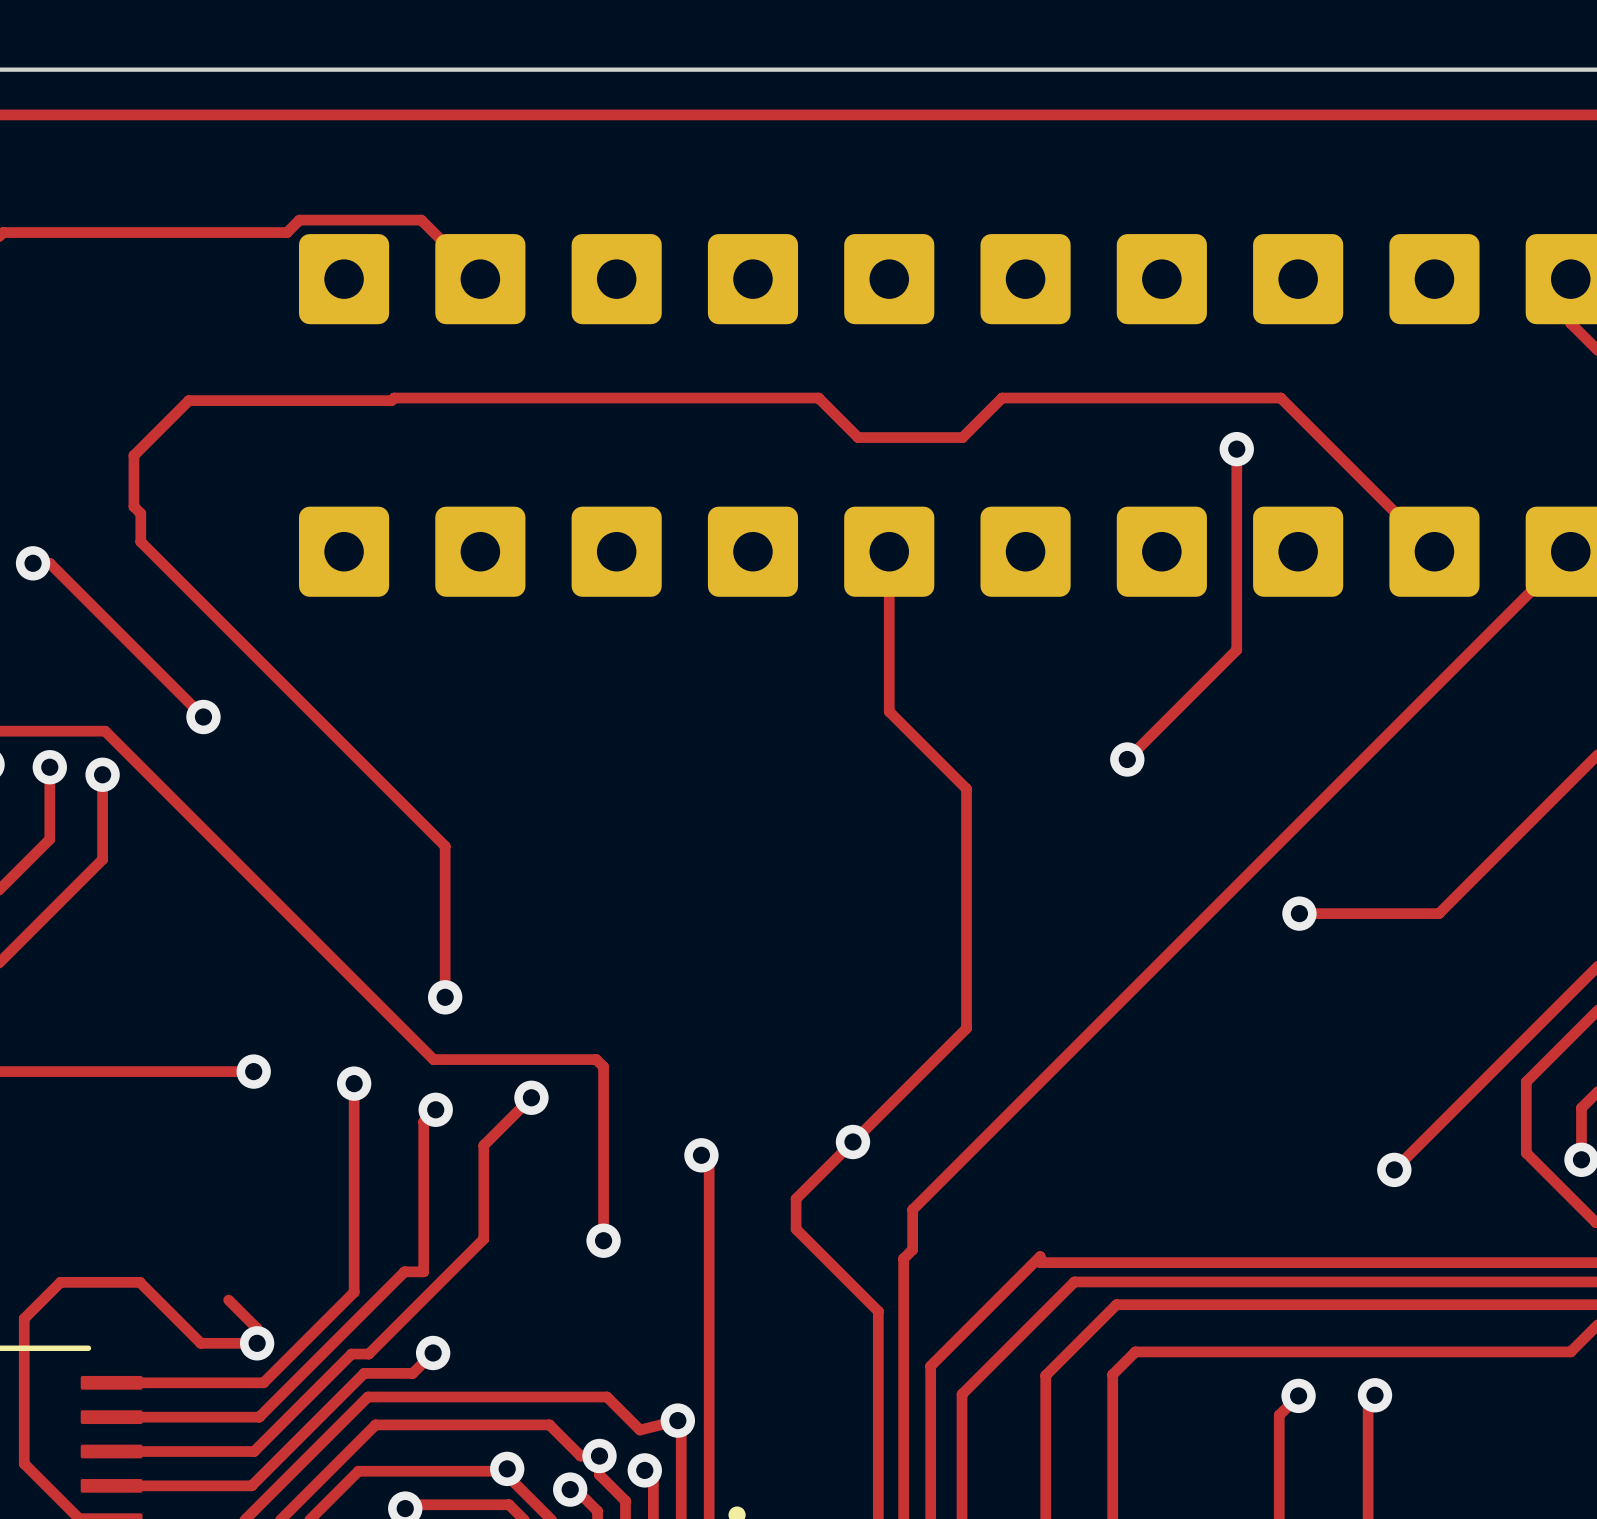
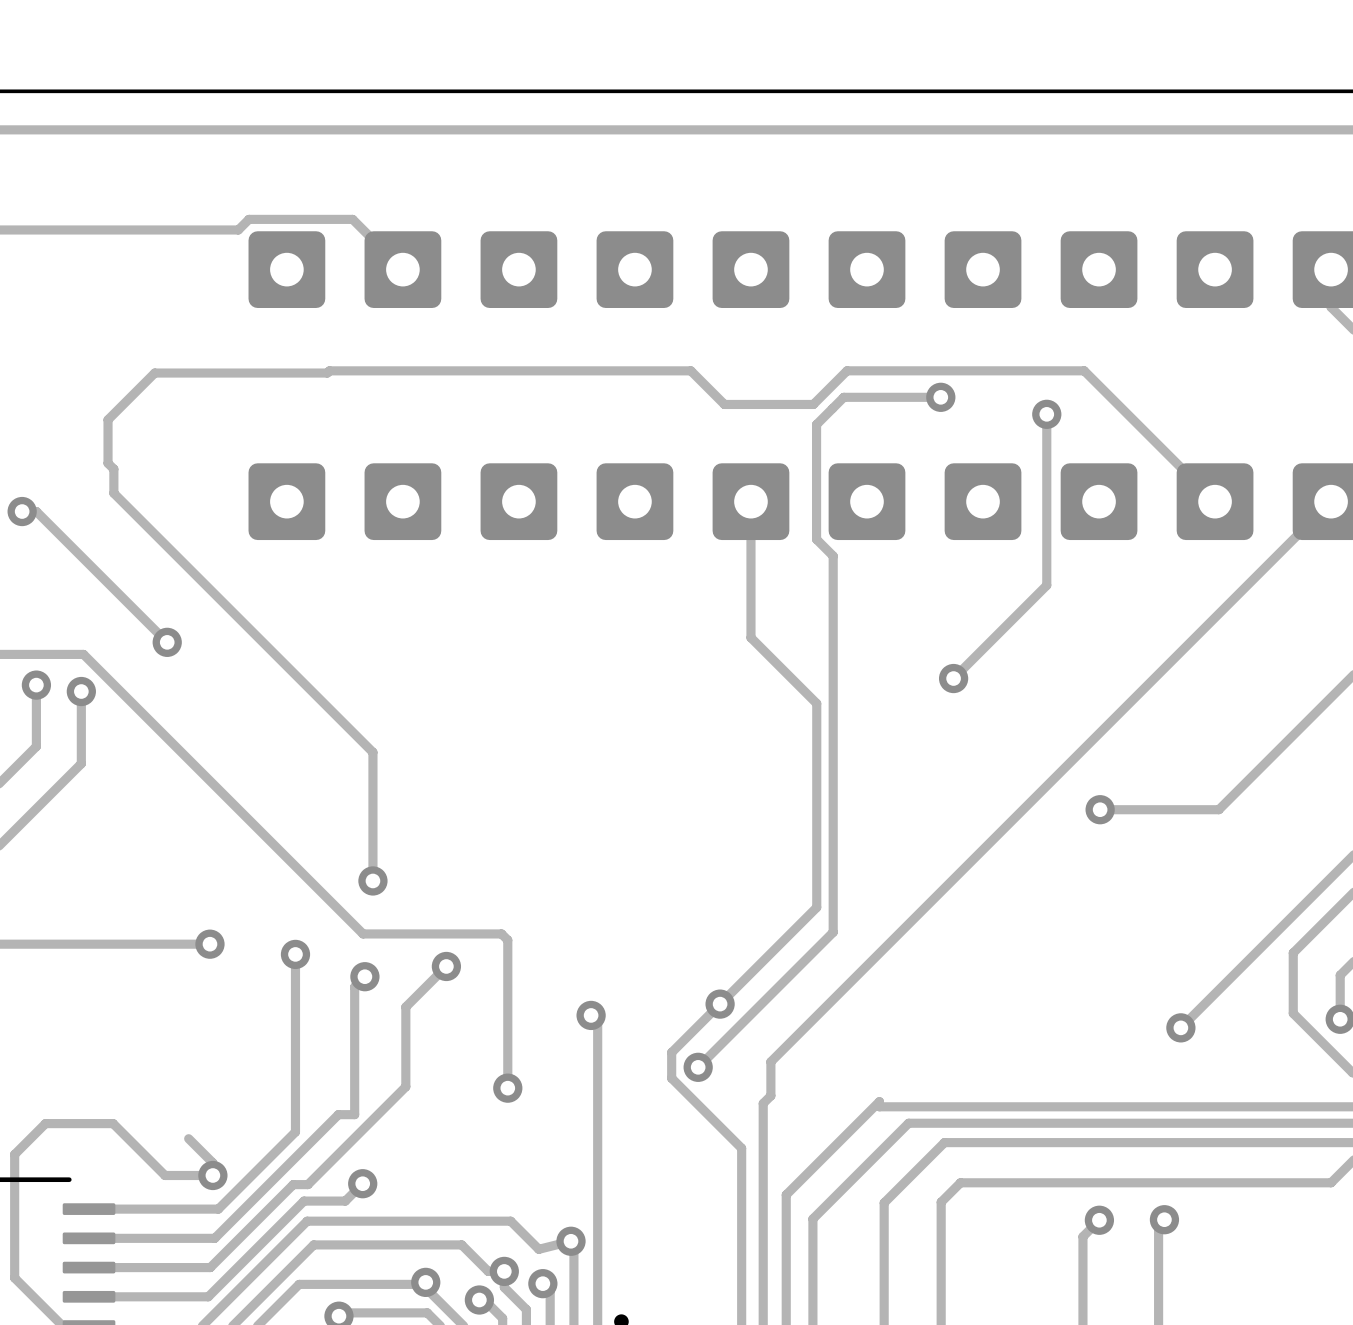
track: none -> (940, 397) (843, 397) (816, 424) (816, 539) (833, 556) (833, 932) (698, 1067)
via: none -> (940, 397)
via: none -> (698, 1067)

